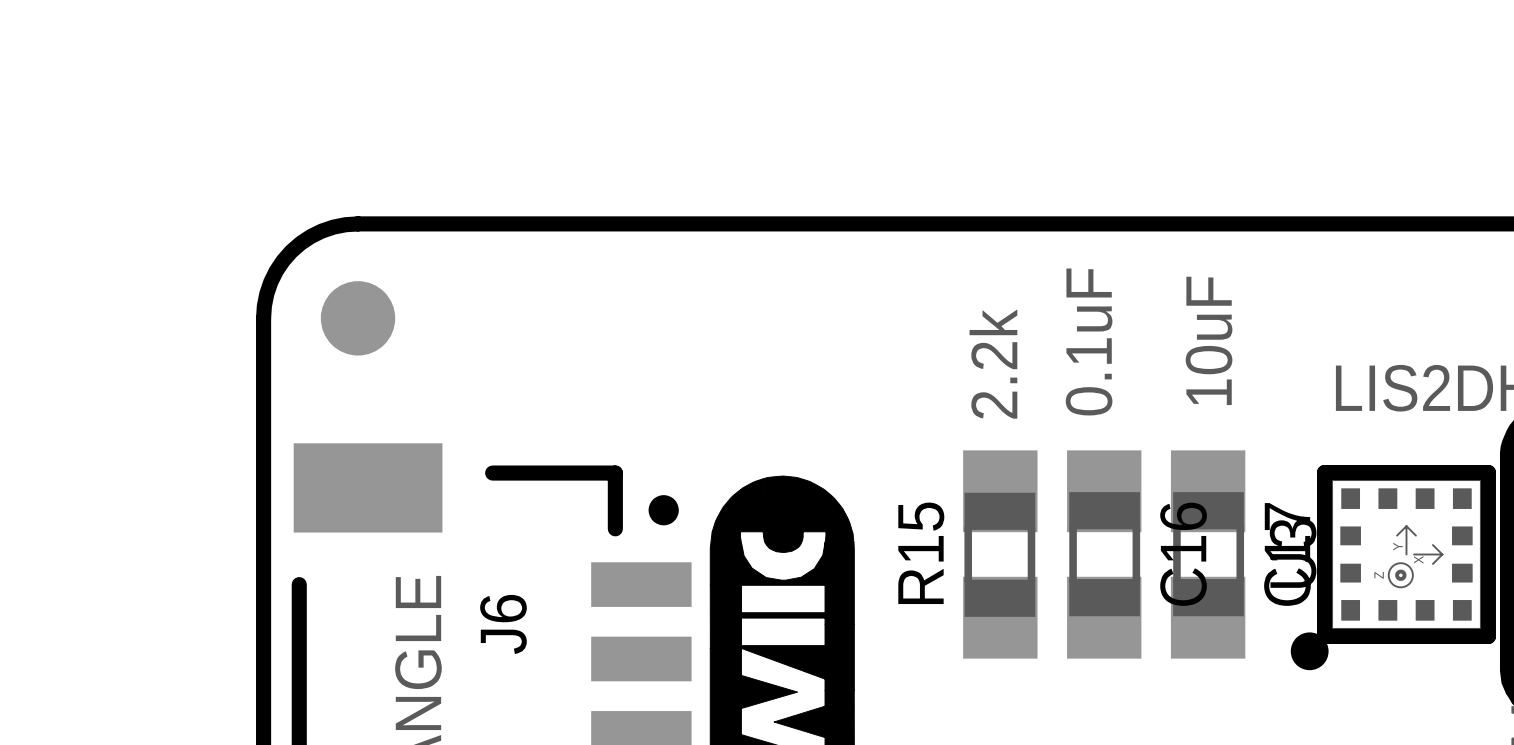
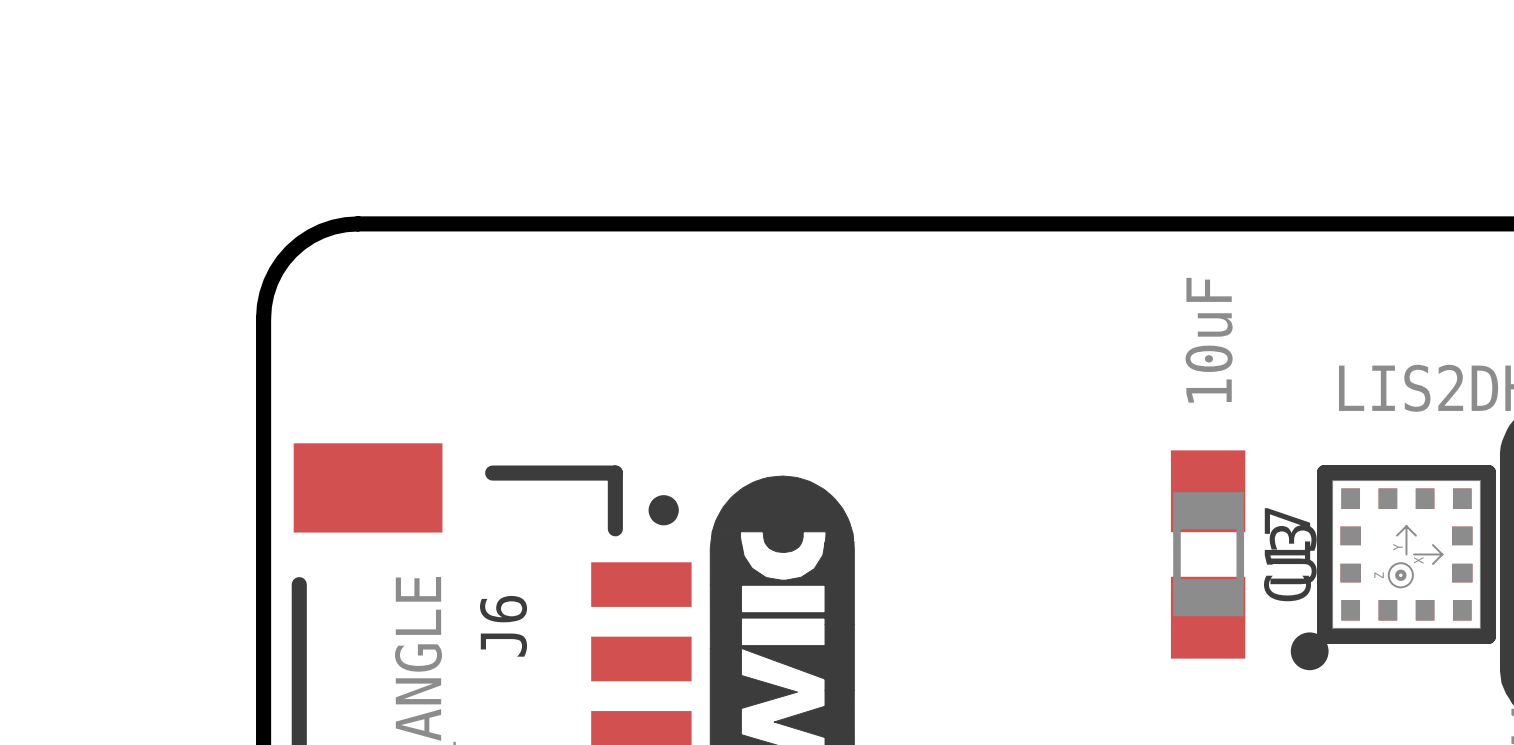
part: (358, 318) -> none
R15: 2.2k (1000, 554) -> none
C16: 0.1uF (1104, 554) -> none

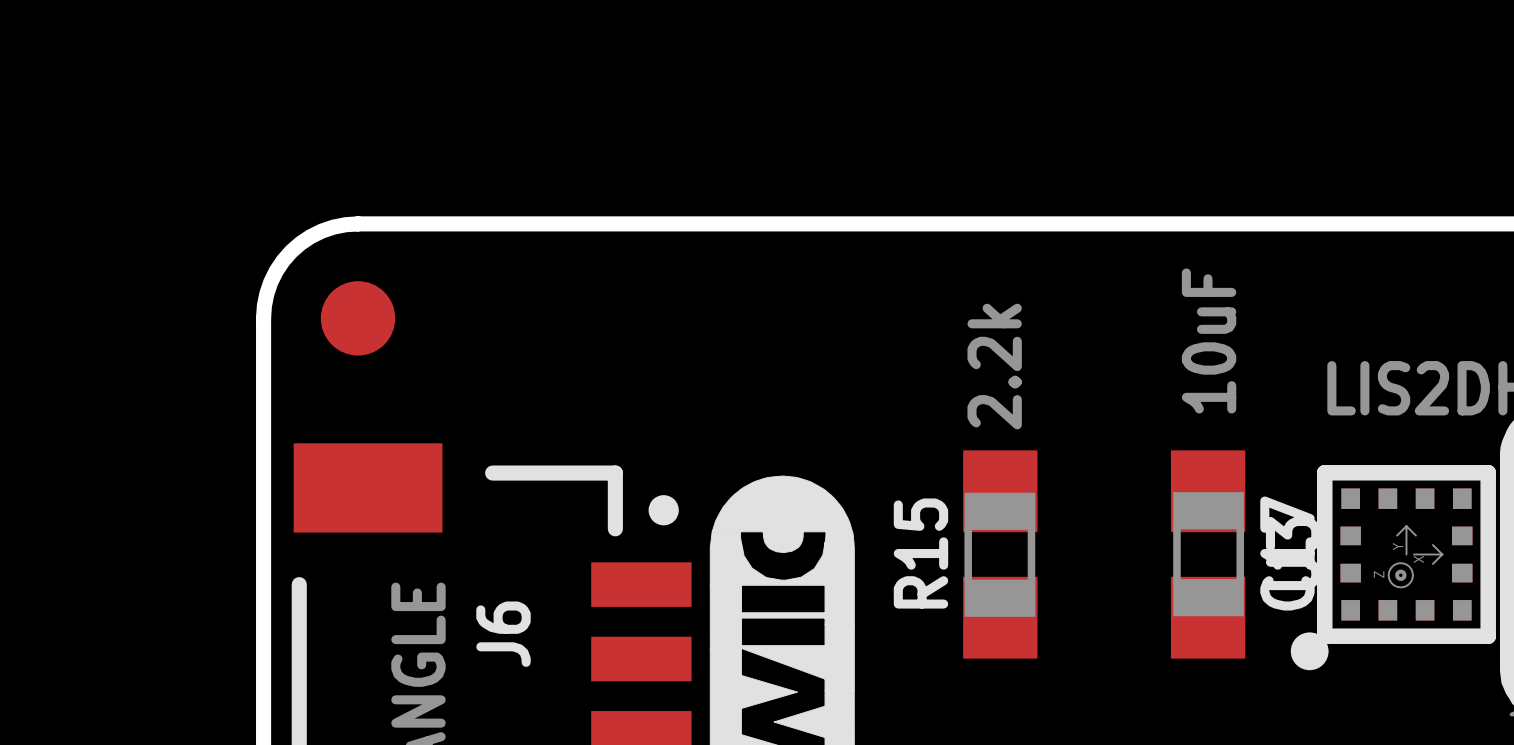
part: none -> (358, 318)
R15: none -> 2.2k (1000, 554)

